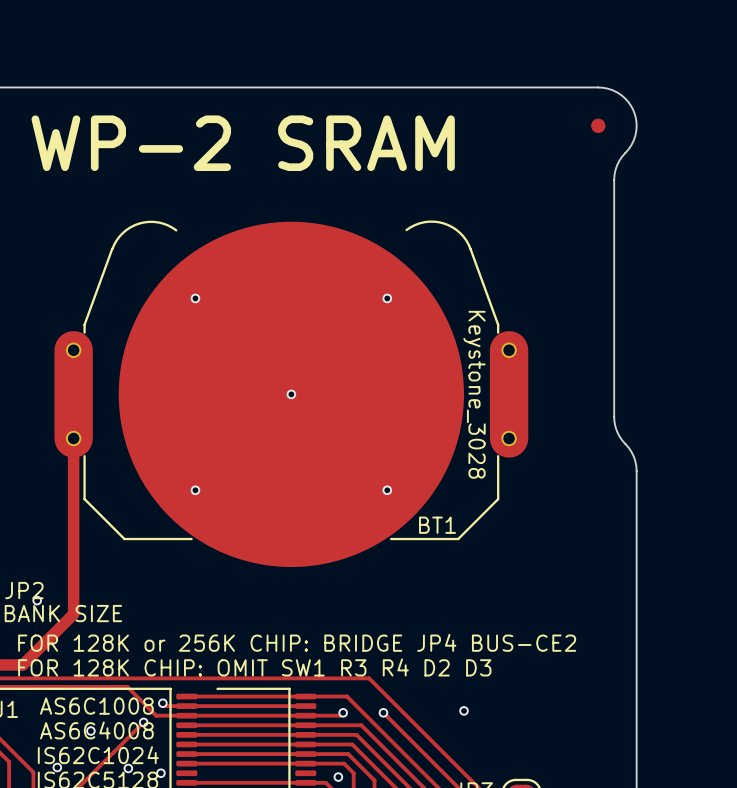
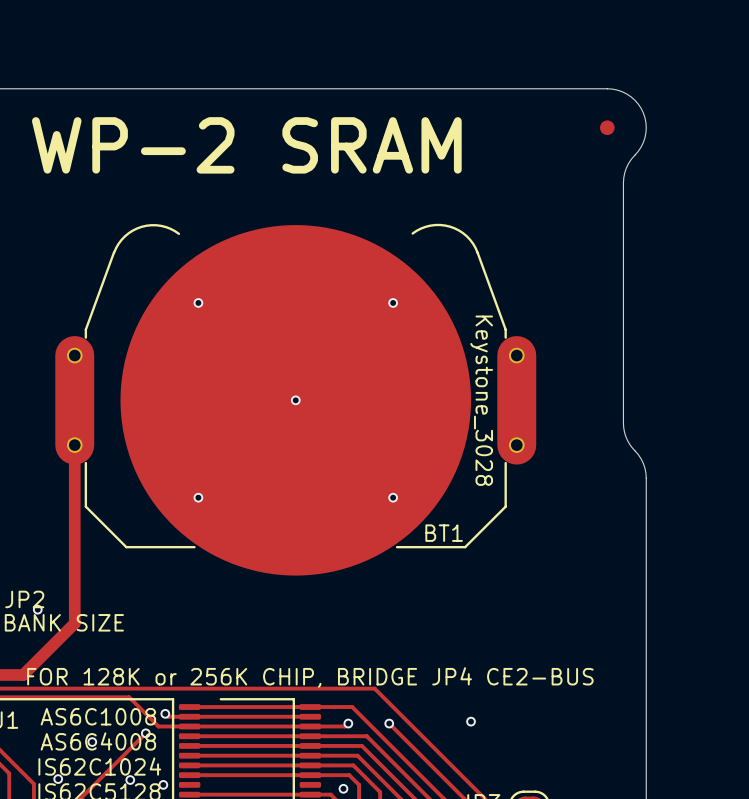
text: FOR 128K or 256K CHIP: BRIDGE JP4 BUS-CE2 (297, 642) -> FOR 128K or 256K CHIP, BRIDGE JP4 CE2-BUS (310, 677)
text: FOR 128K CHIP: OMIT SW1 R3 R4 D2 D3 (254, 667) -> none

